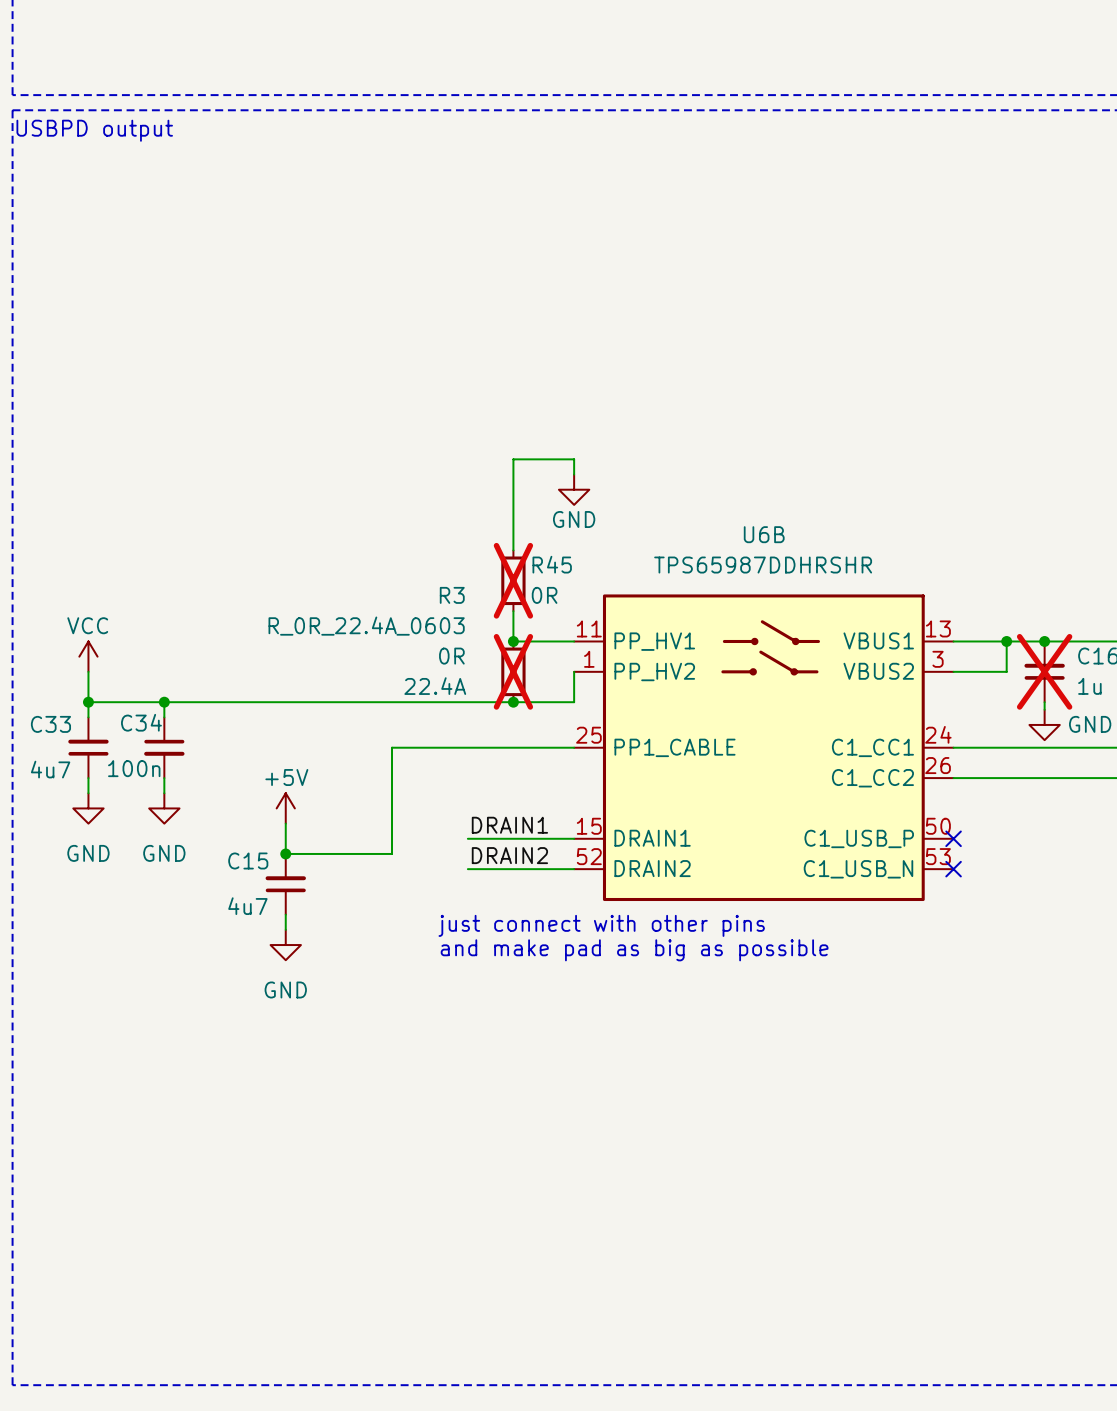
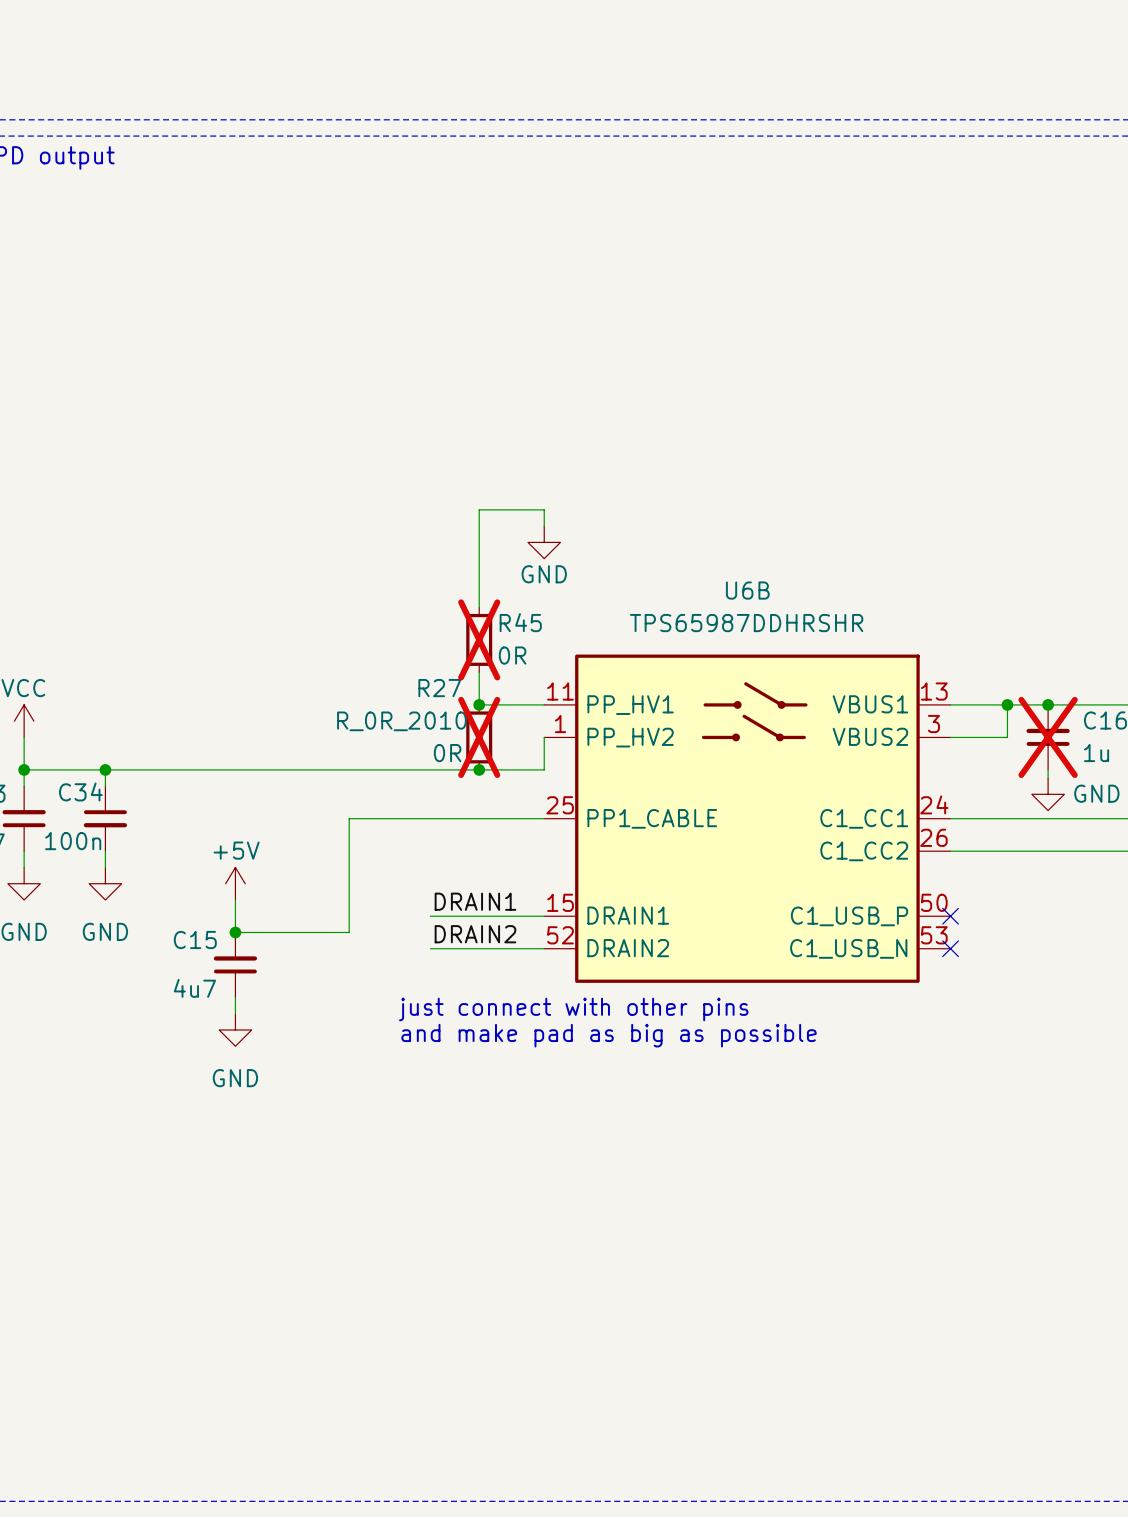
R3 name: R3 (452, 595) -> R27 (439, 688)
R3 value: R_0R_22.4A_0603 (366, 626) -> R_0R_2010 (401, 721)
R3 text position: 0R (451, 656) -> 0R (447, 753)
R3 text: 22.4A (435, 686) -> none

